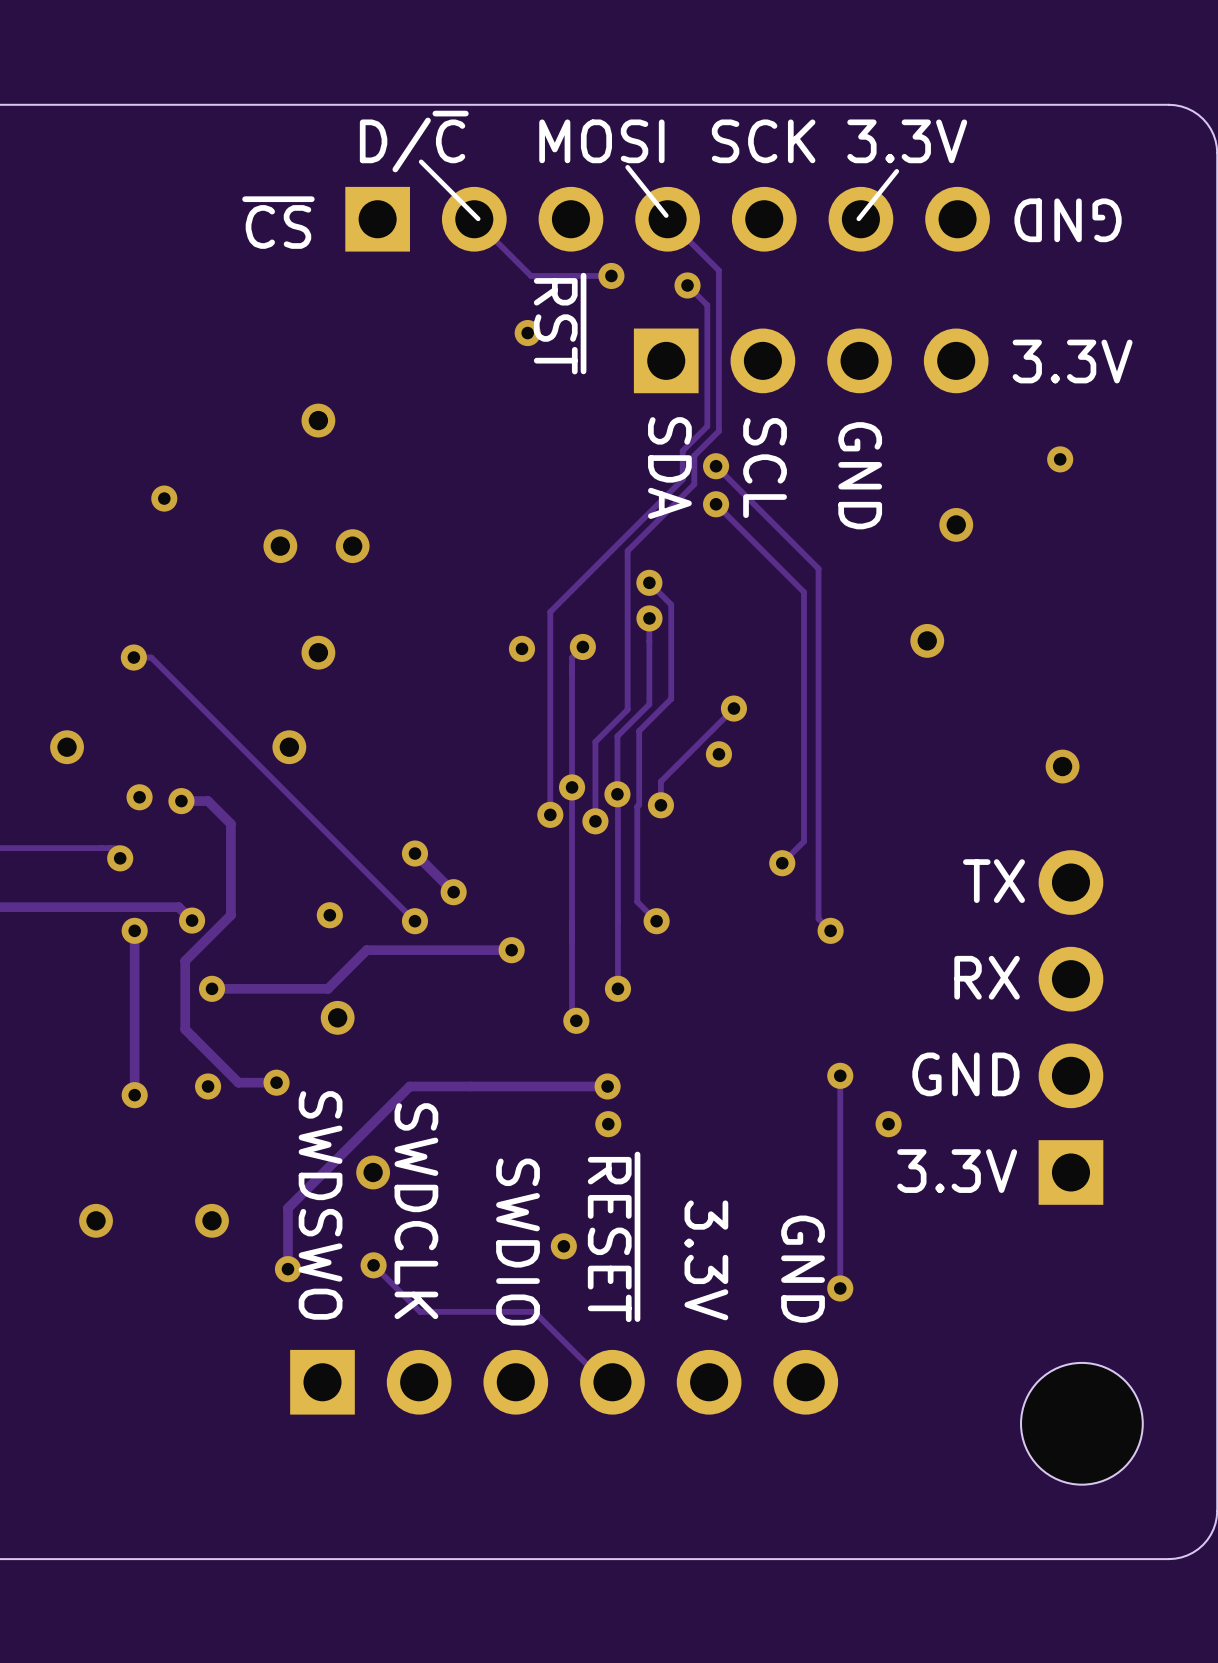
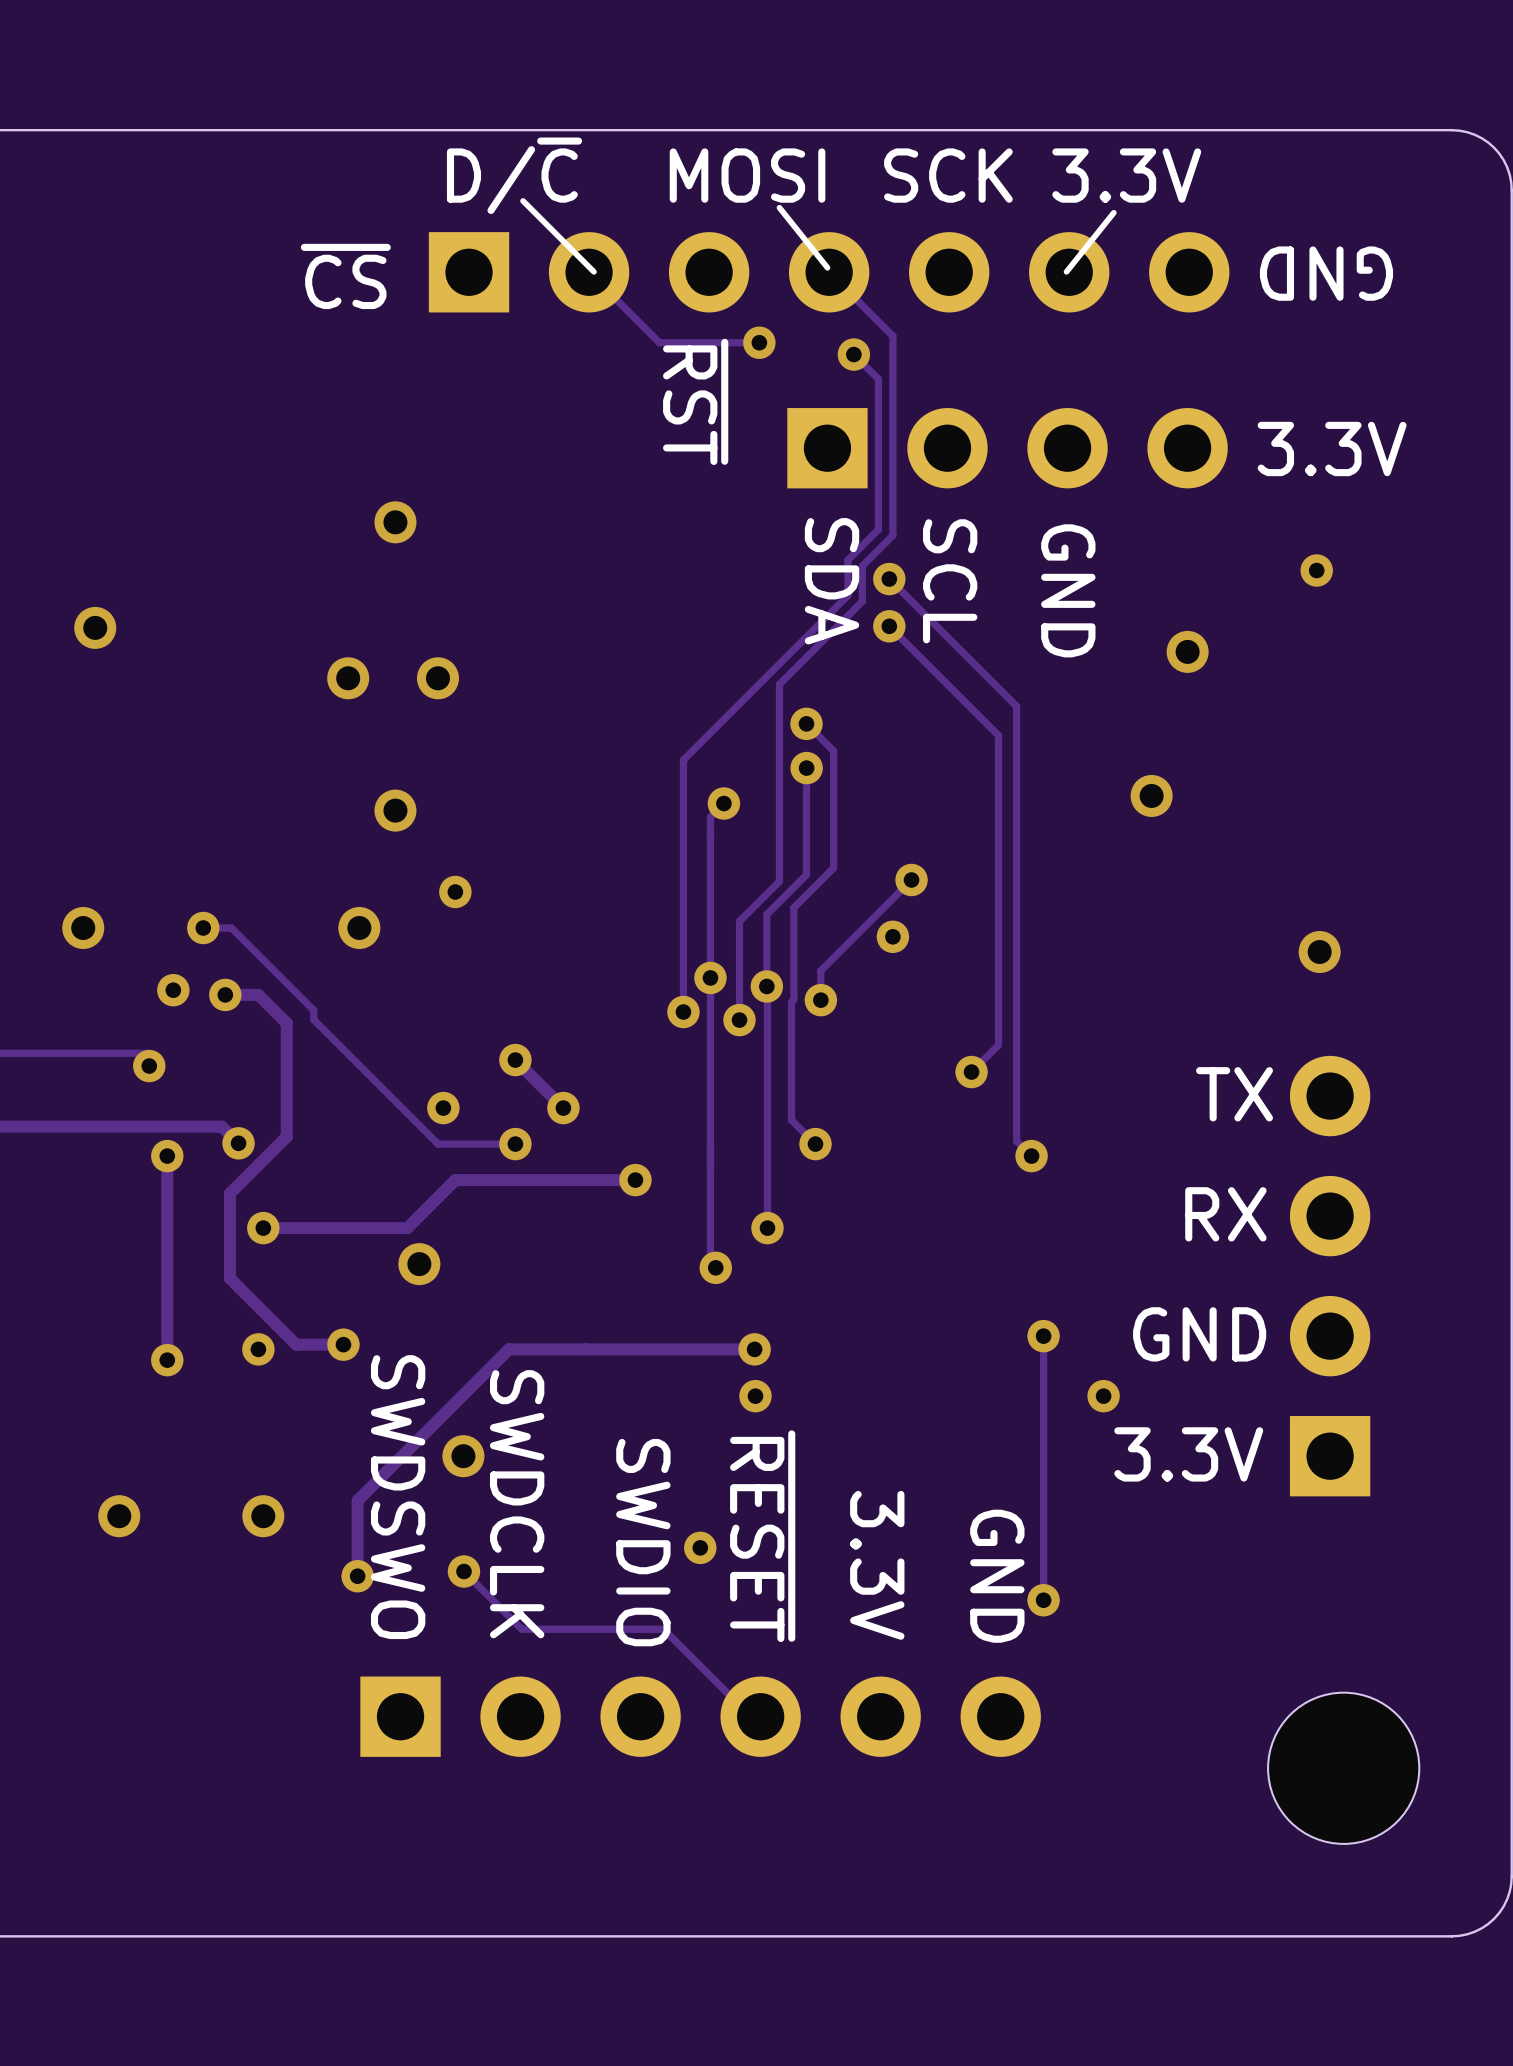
via: (527, 333) -> none
via: (164, 498) -> none
via: none -> (95, 627)
via: (521, 648) -> none
track: (133, 657) (151, 657) (414, 921) -> (203, 928) (231, 928) (313, 1010) (313, 1019) (438, 1144) (515, 1144)
via position: (133, 657) -> (203, 928)
via: none -> (455, 891)
via position: (329, 915) -> (443, 1108)

